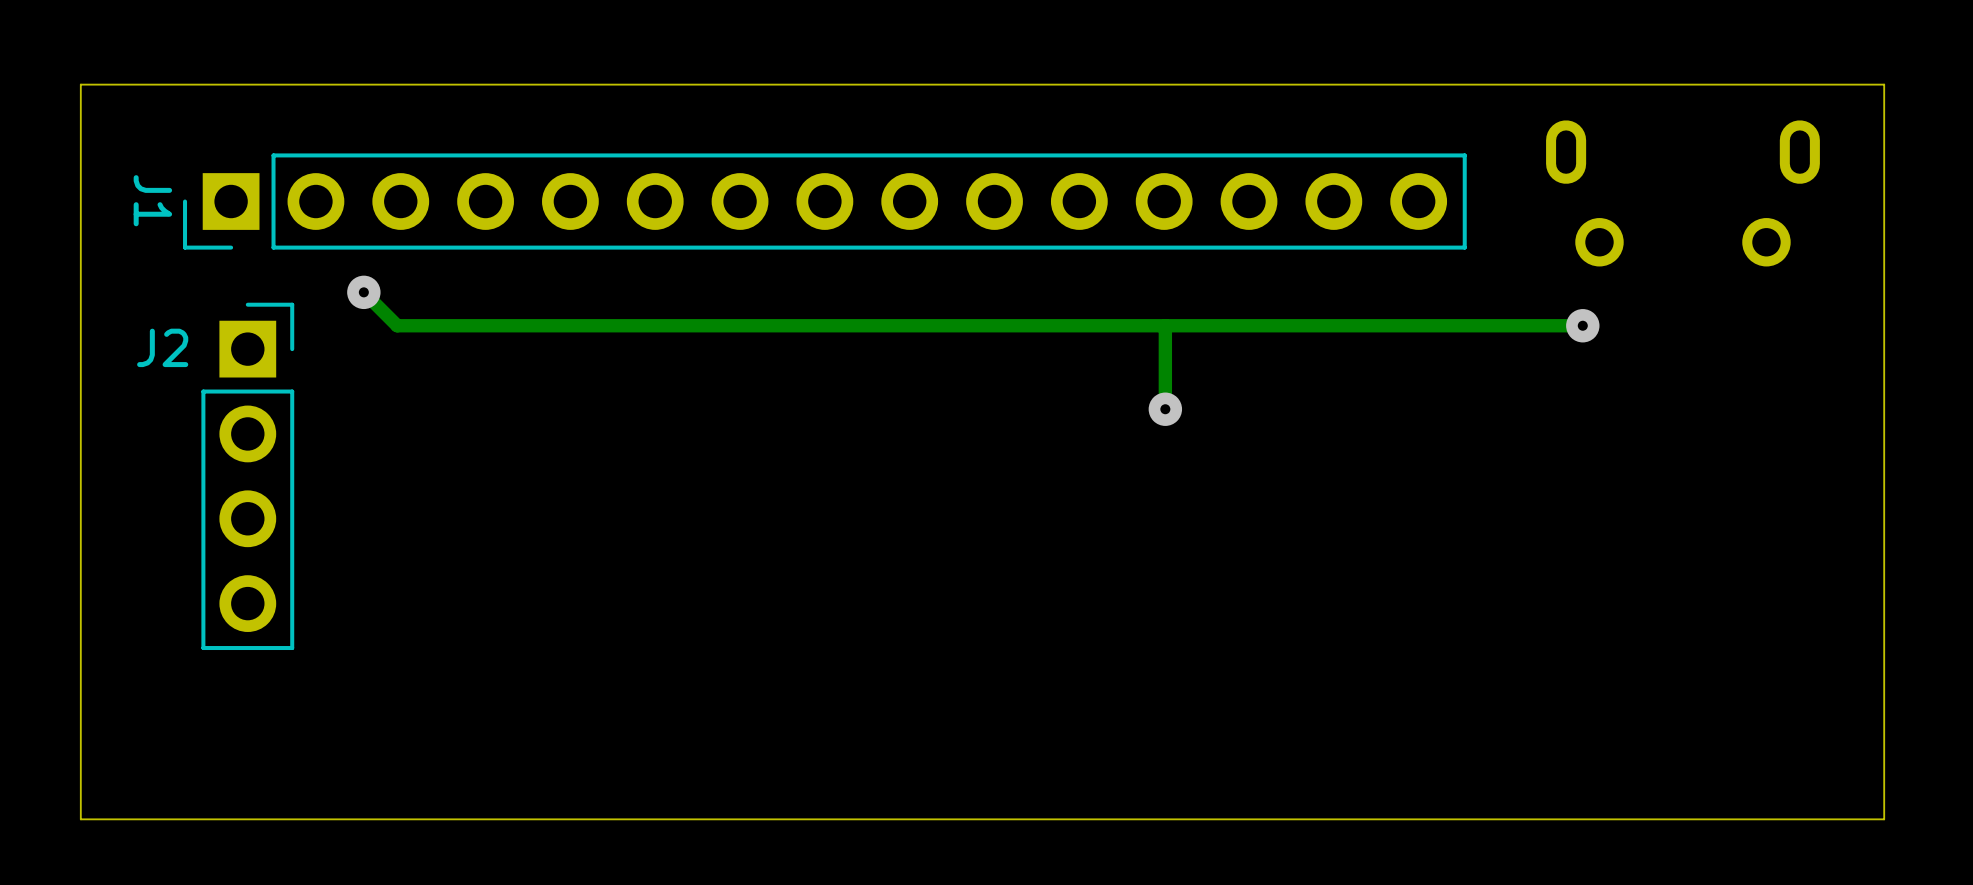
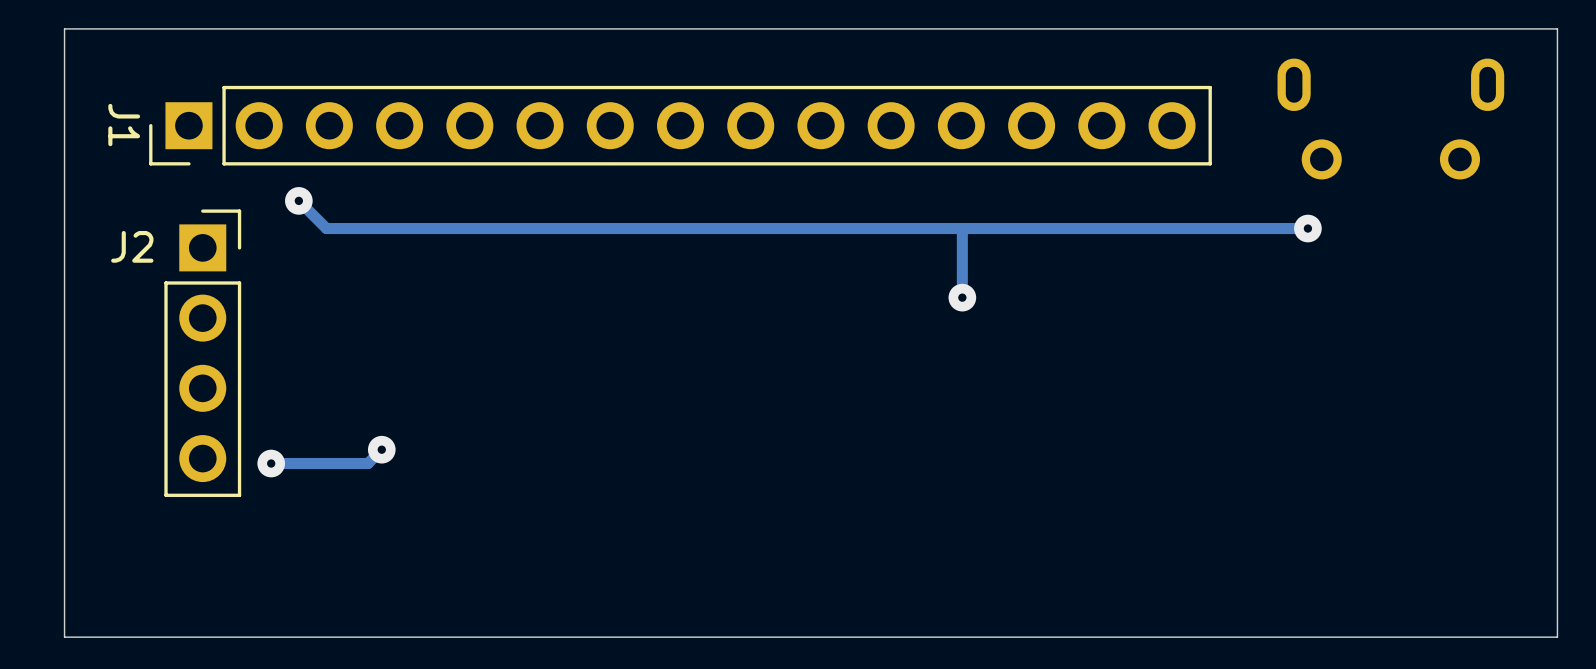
track: none -> (381, 449) (367, 463) (271, 463)
via: none -> (381, 449)
via: none -> (271, 463)

